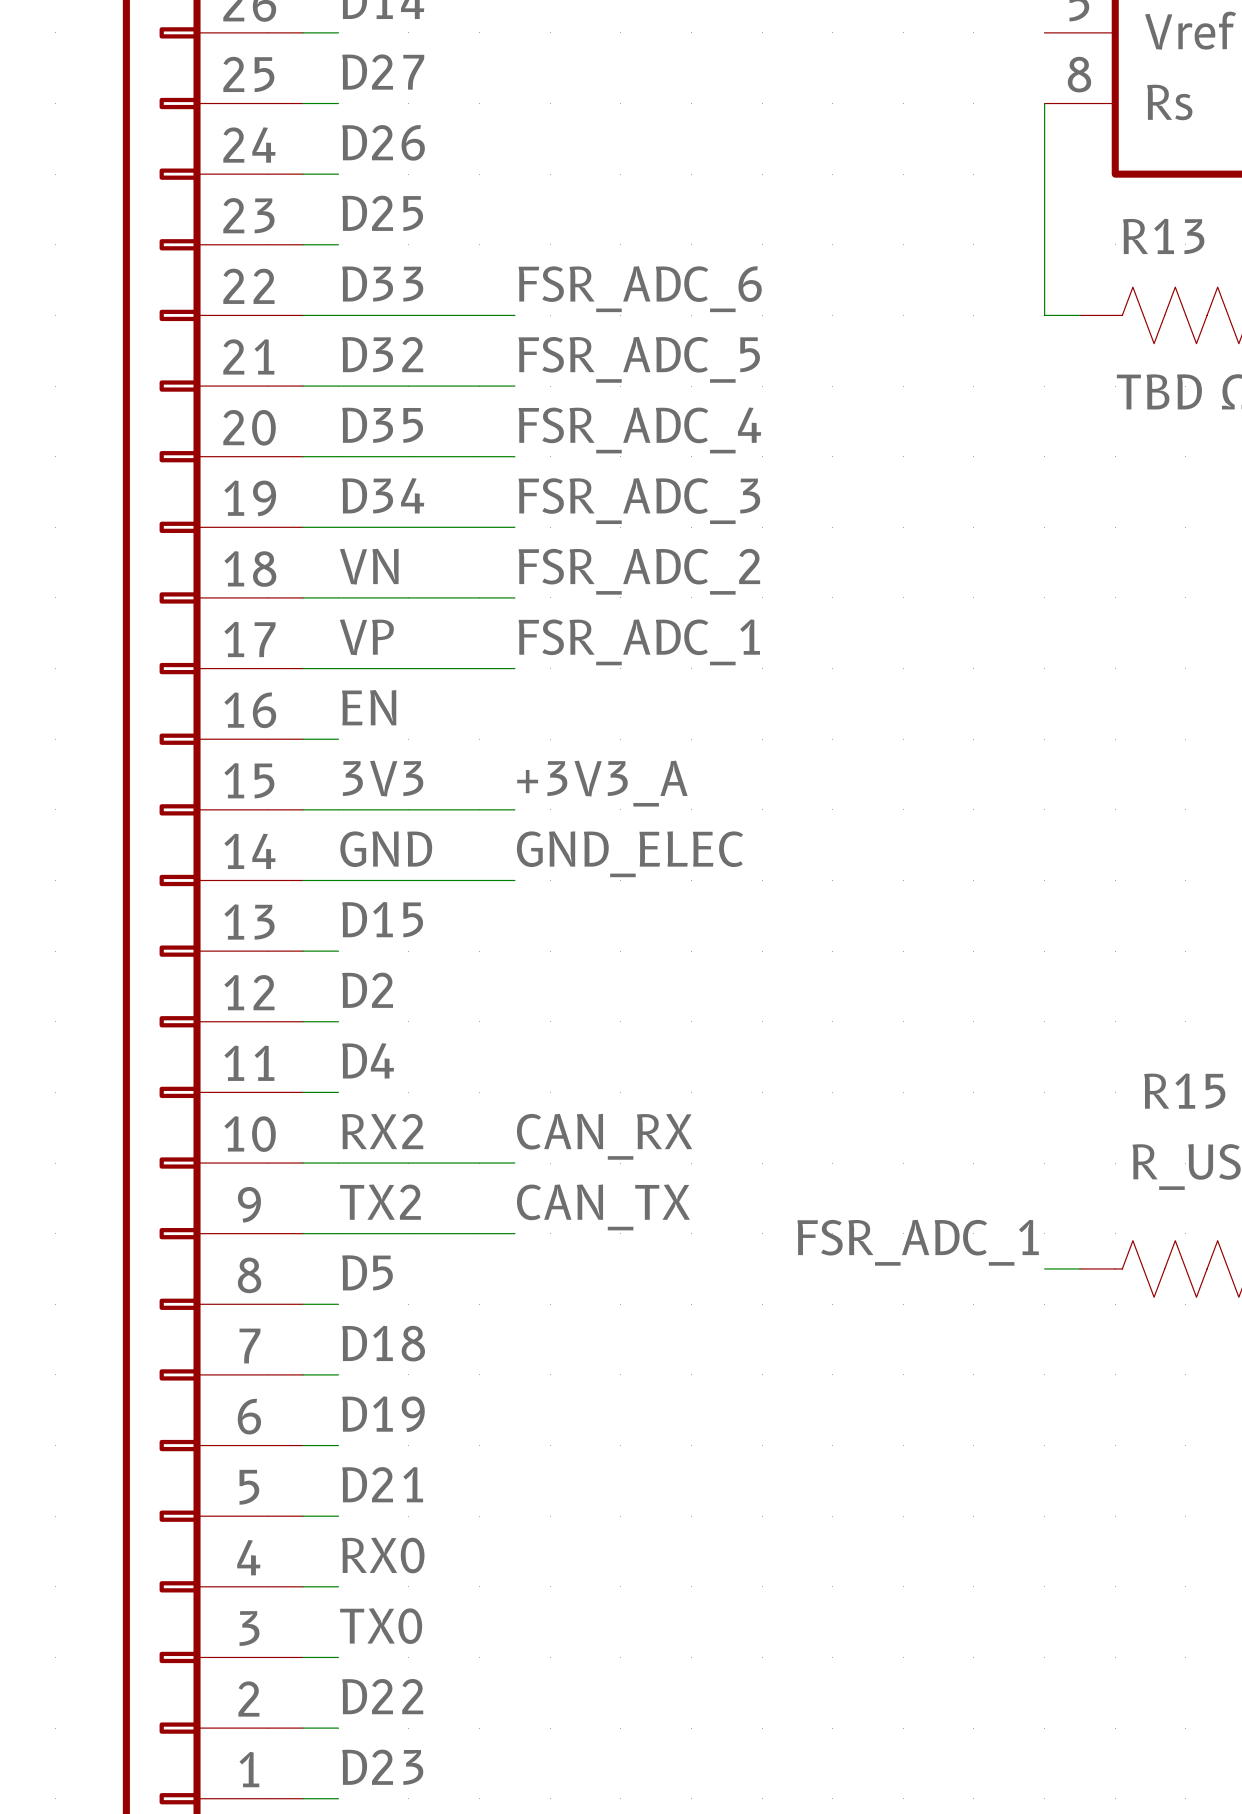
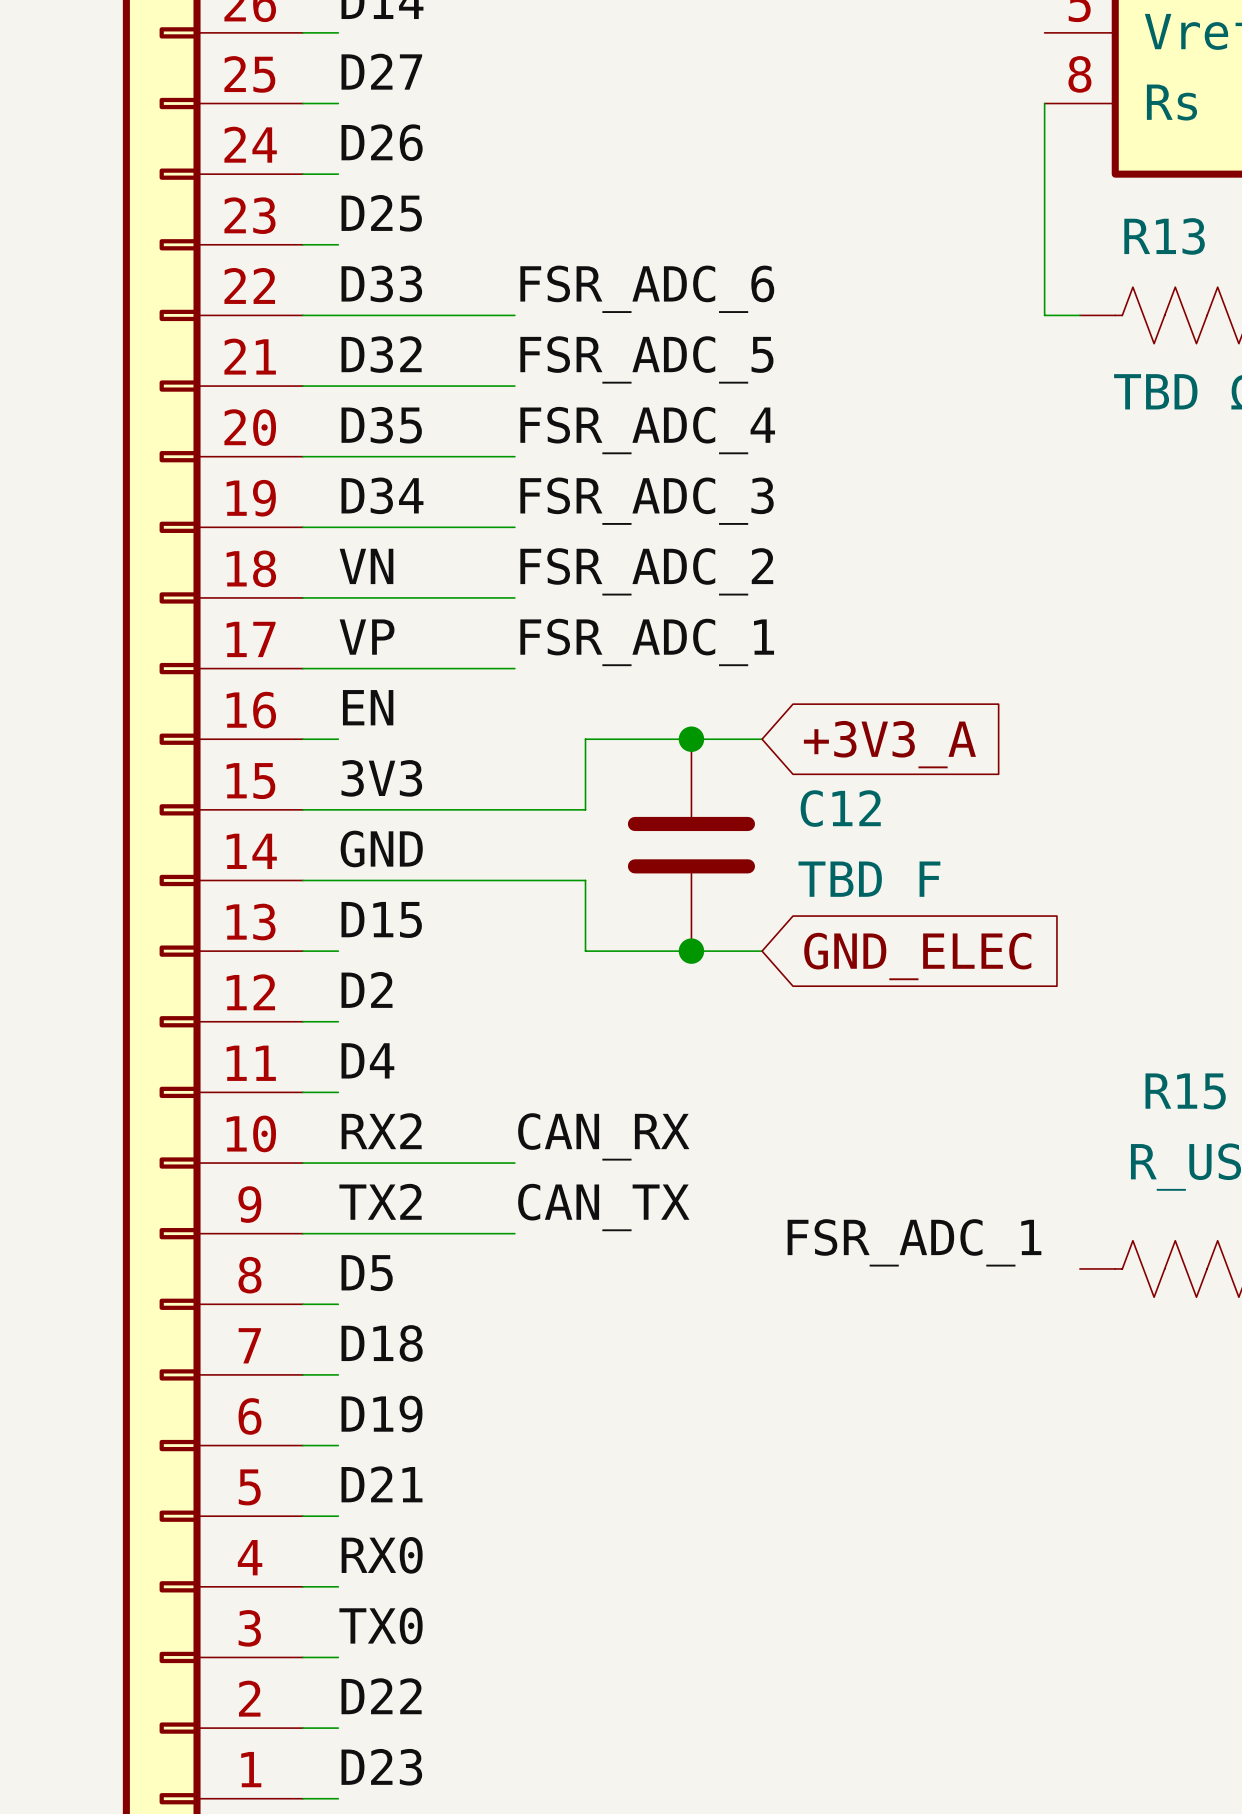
junction: none -> (691, 739)
wire: none -> (762, 739) (585, 739) (585, 809) (514, 809)
global label: none -> +3V3_A (889, 744)
label: +3V3_A (602, 783) -> none
C12: none -> TBD F (691, 845)
label: GND_ELEC (630, 854) -> none
wire: none -> (514, 880) (585, 880) (585, 951) (762, 951)
junction: none -> (691, 951)
global label: none -> GND_ELEC (917, 956)
wire: (1044, 1268) (1079, 1268) -> none

